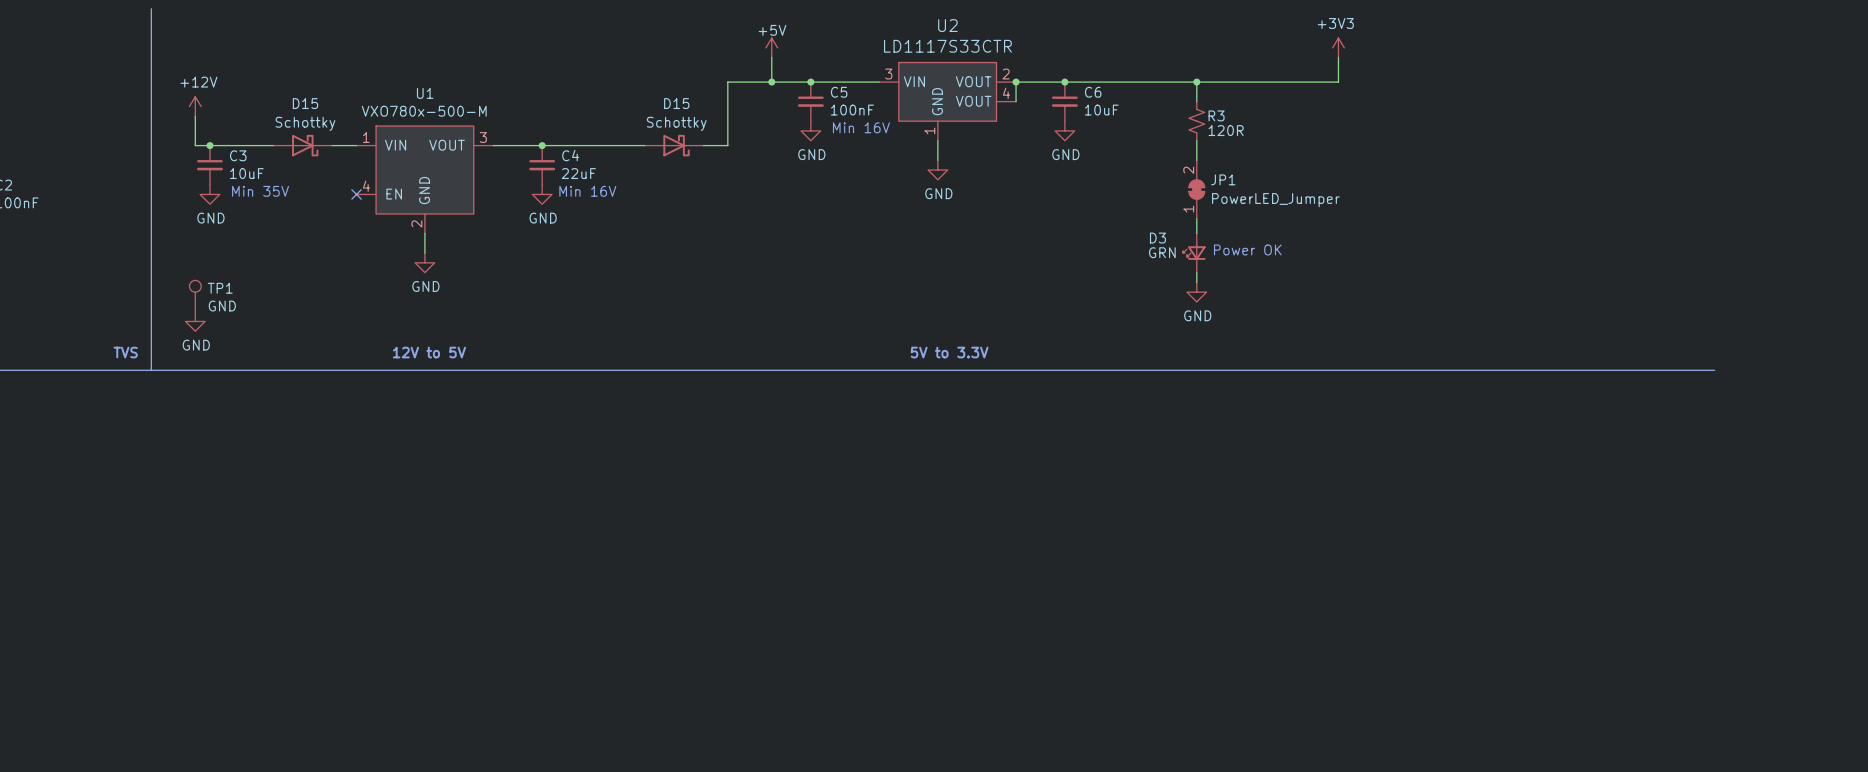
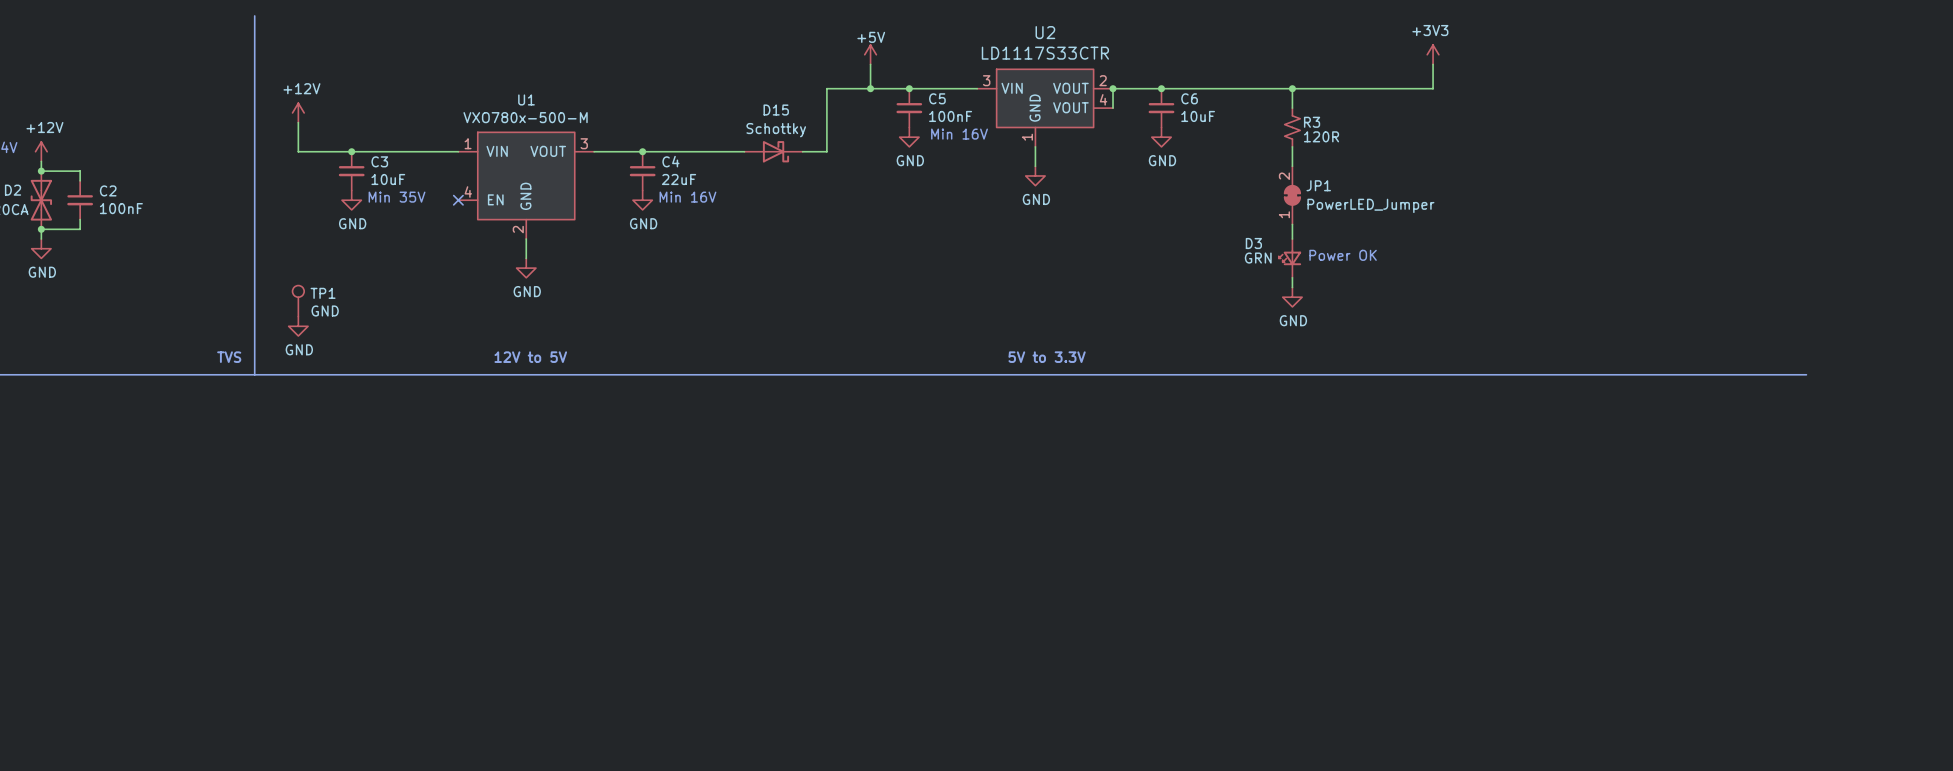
junction position: (209, 145) -> (351, 151)
D15: Schottky (302, 145) -> none
C3 position: (209, 165) -> (351, 171)
text position: Min 35V (260, 191) -> Min 35V (397, 197)
power symbol position: GND (209, 194) -> GND (351, 200)

